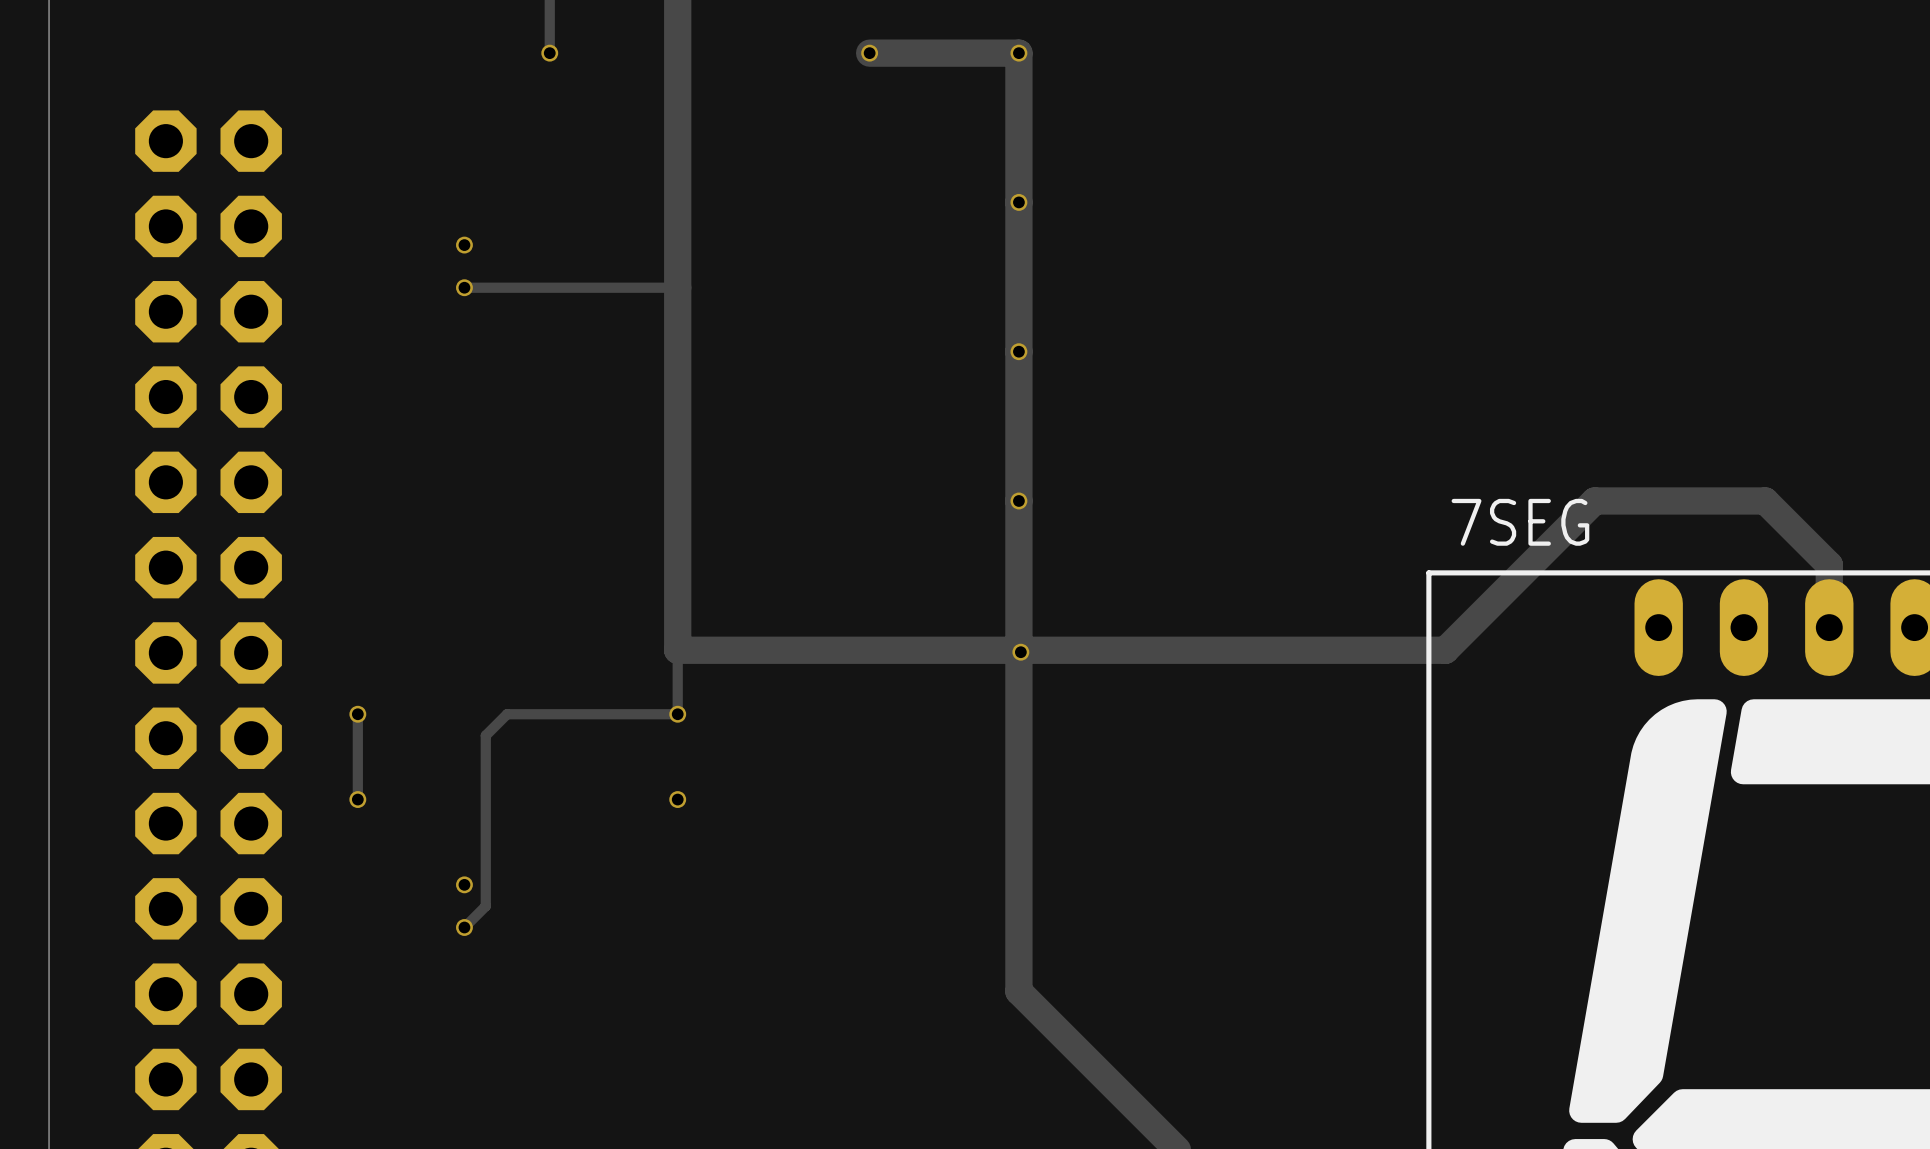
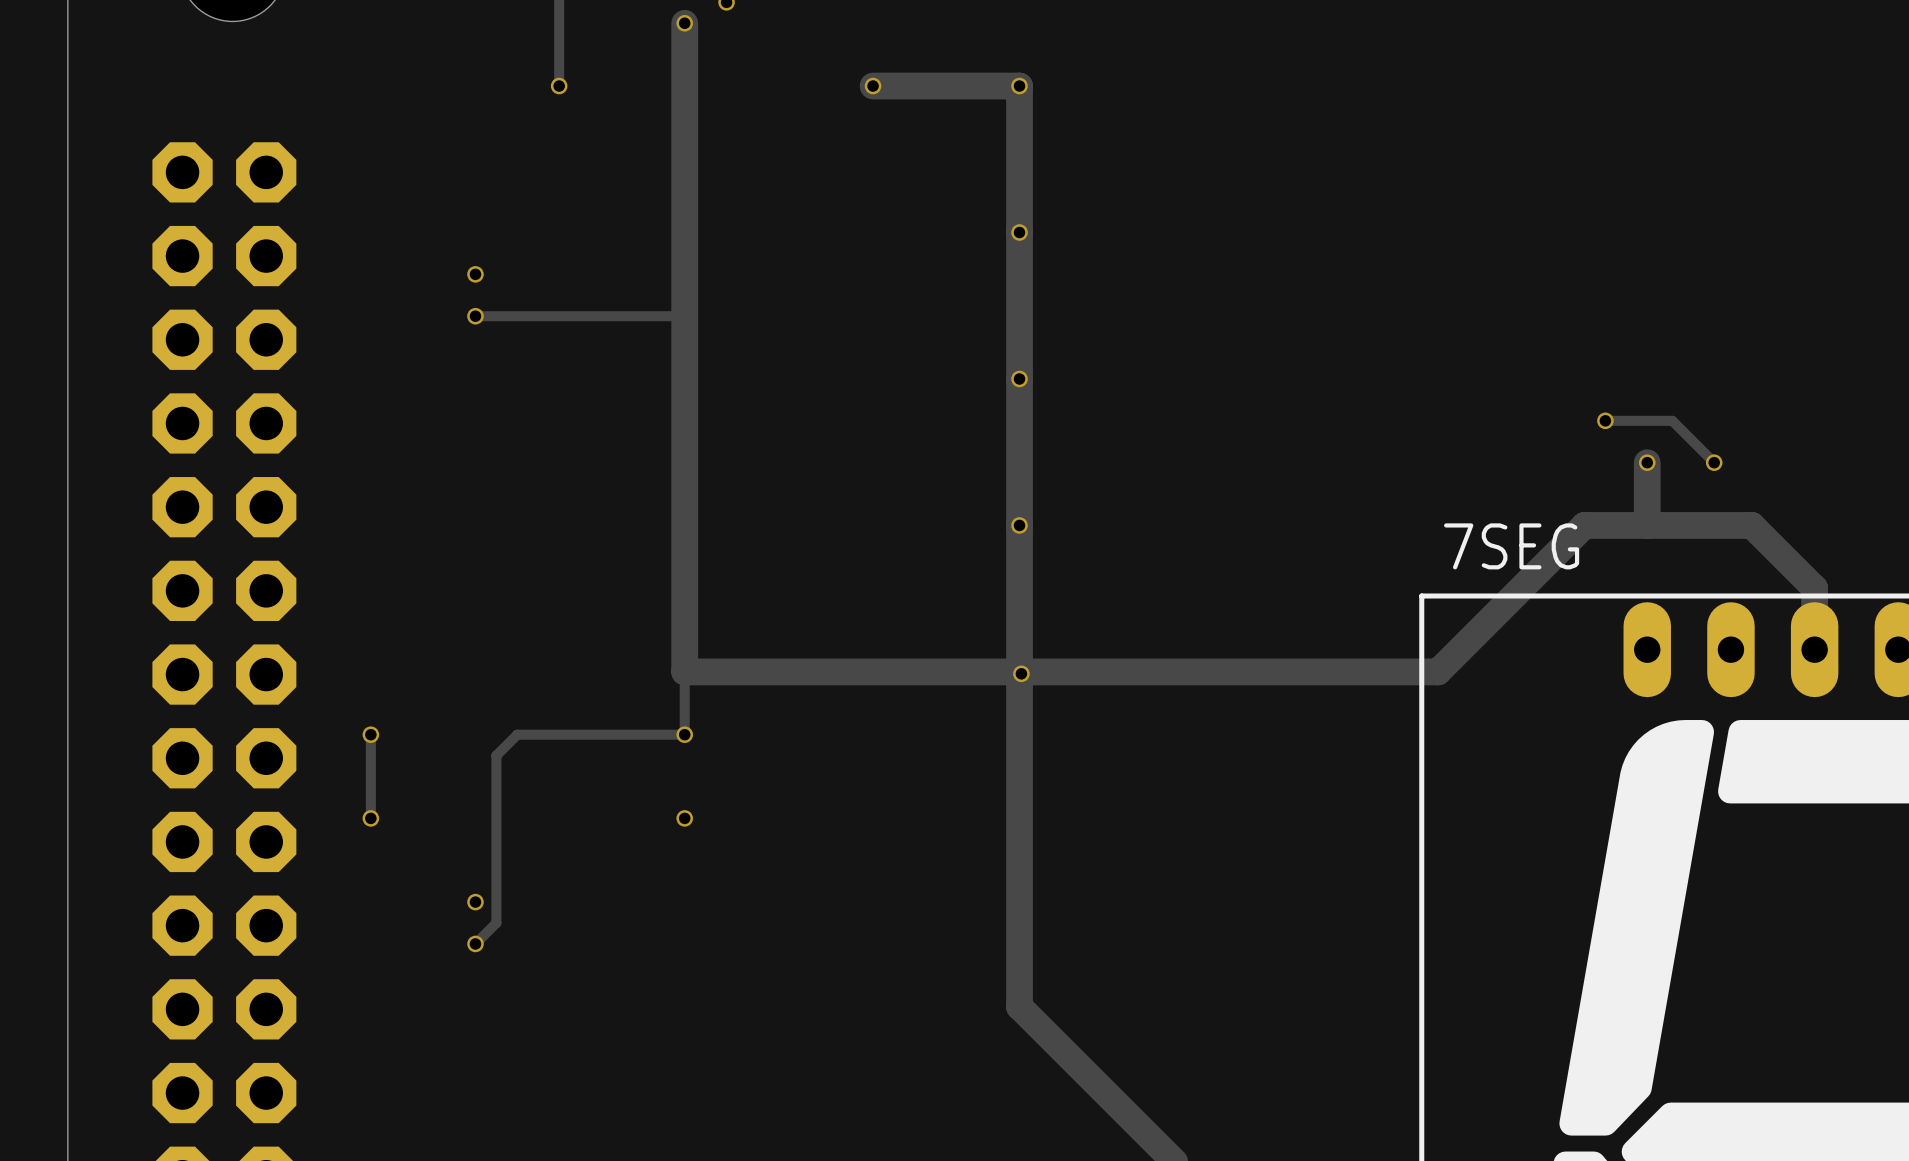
track: none -> (1605, 420) (1672, 420) (1714, 462)
via: none -> (1605, 420)
track: none -> (1647, 462) (1647, 525)
via: none -> (1647, 462)
via: none -> (1714, 462)

